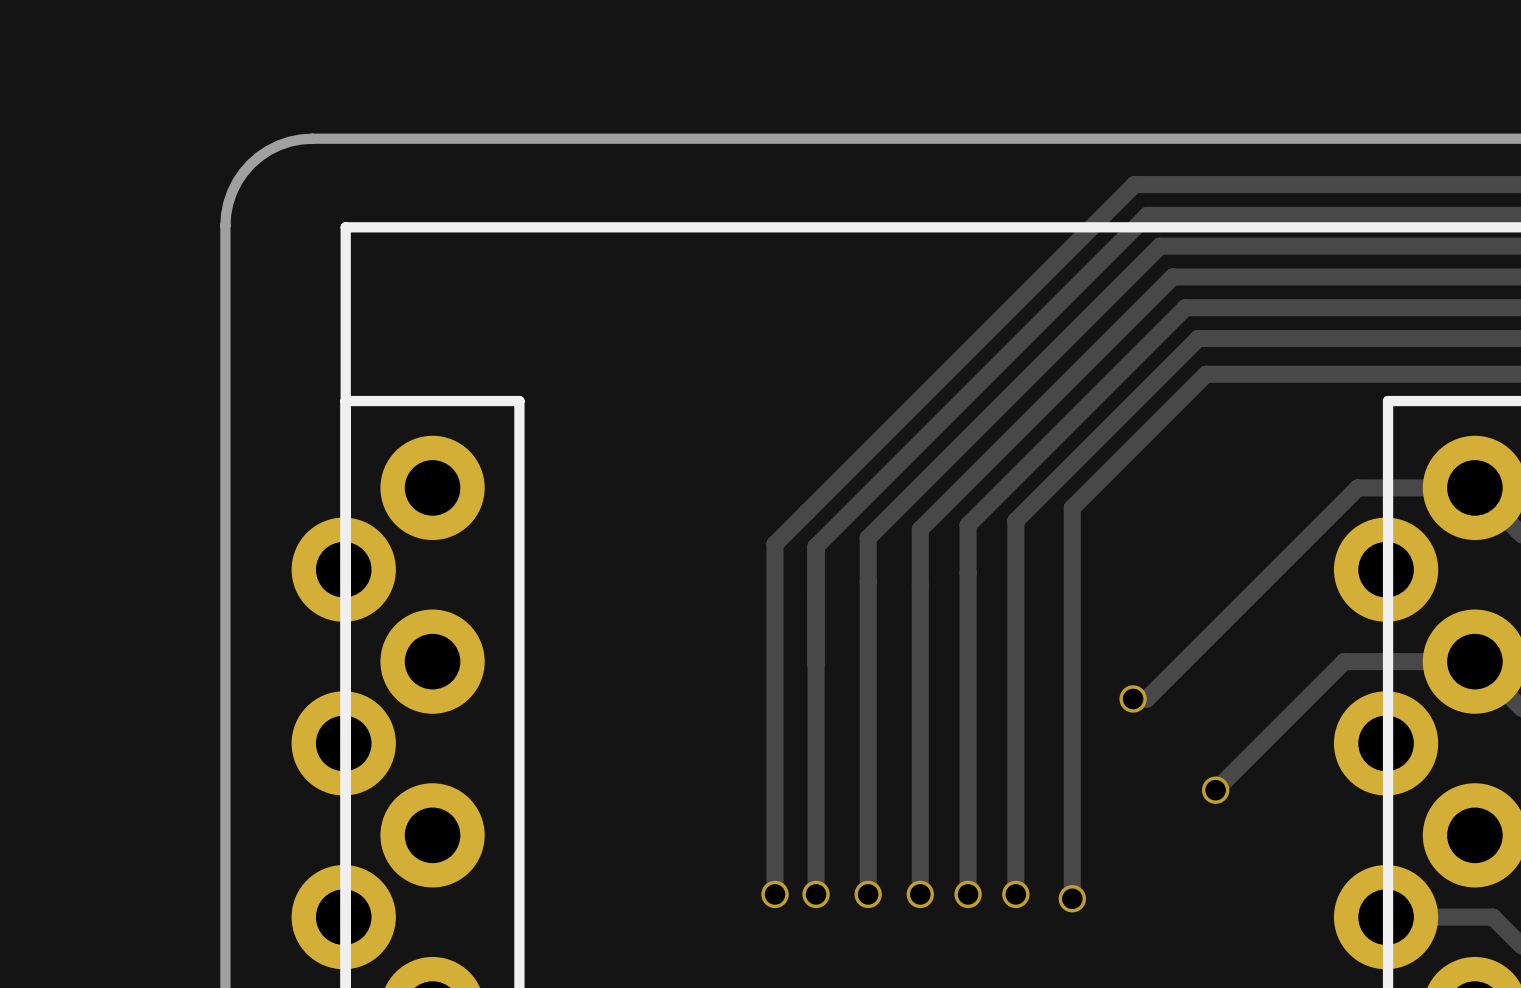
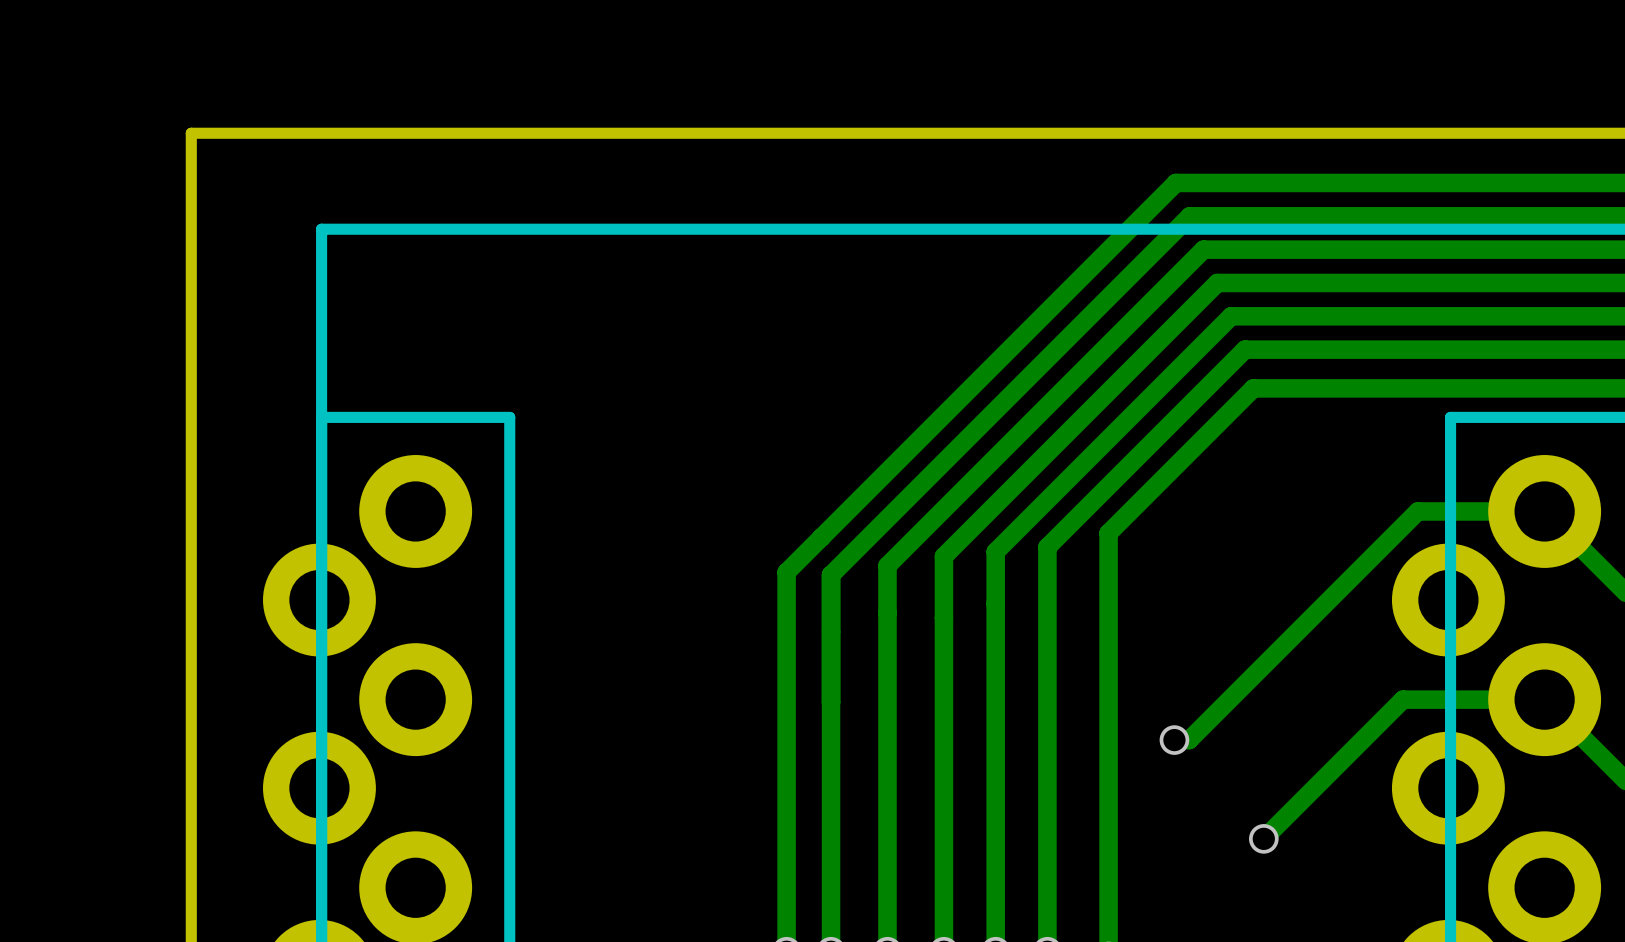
board edge: (312, 138) (279, 145) (250, 164) (232, 192) (225, 225) -> (285, 133) (191, 133) (191, 227)

